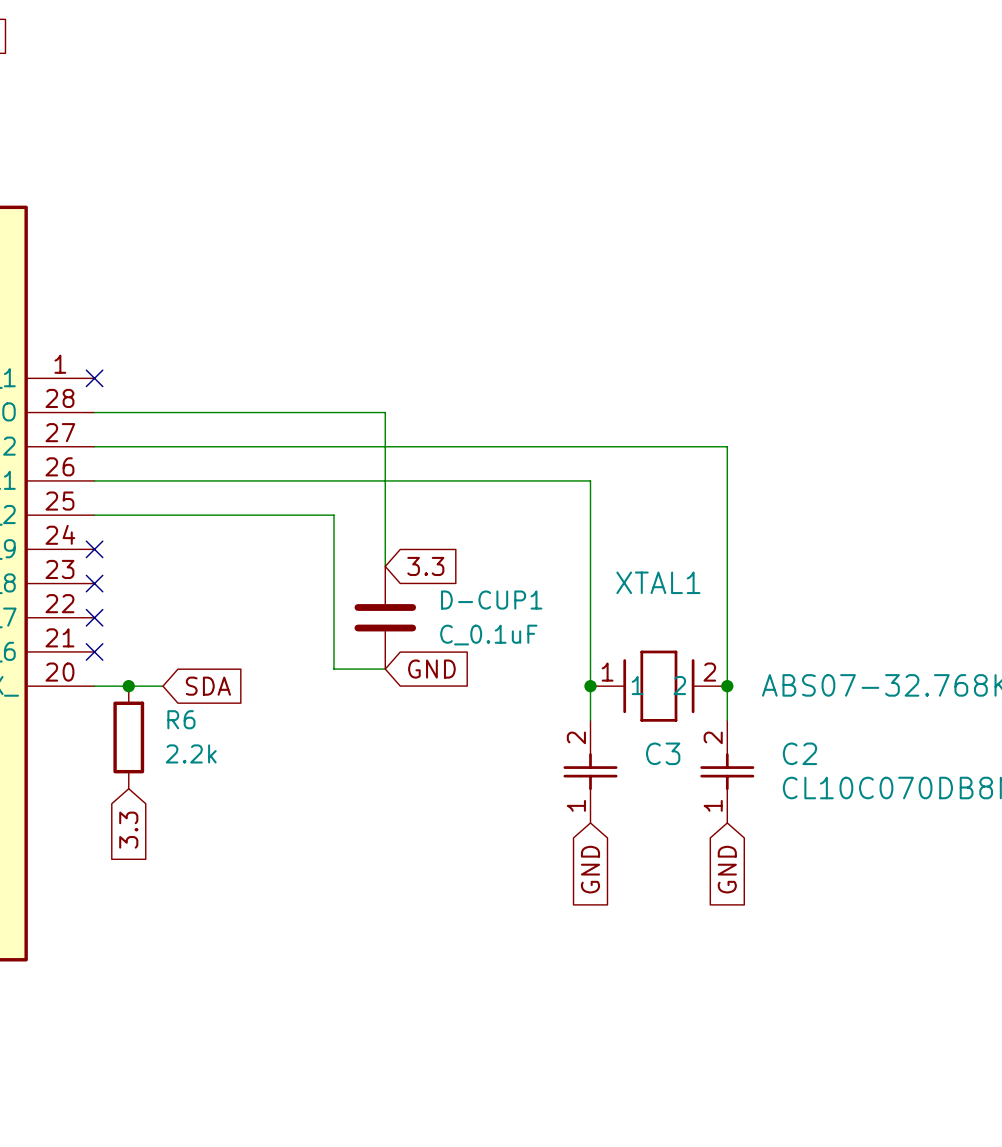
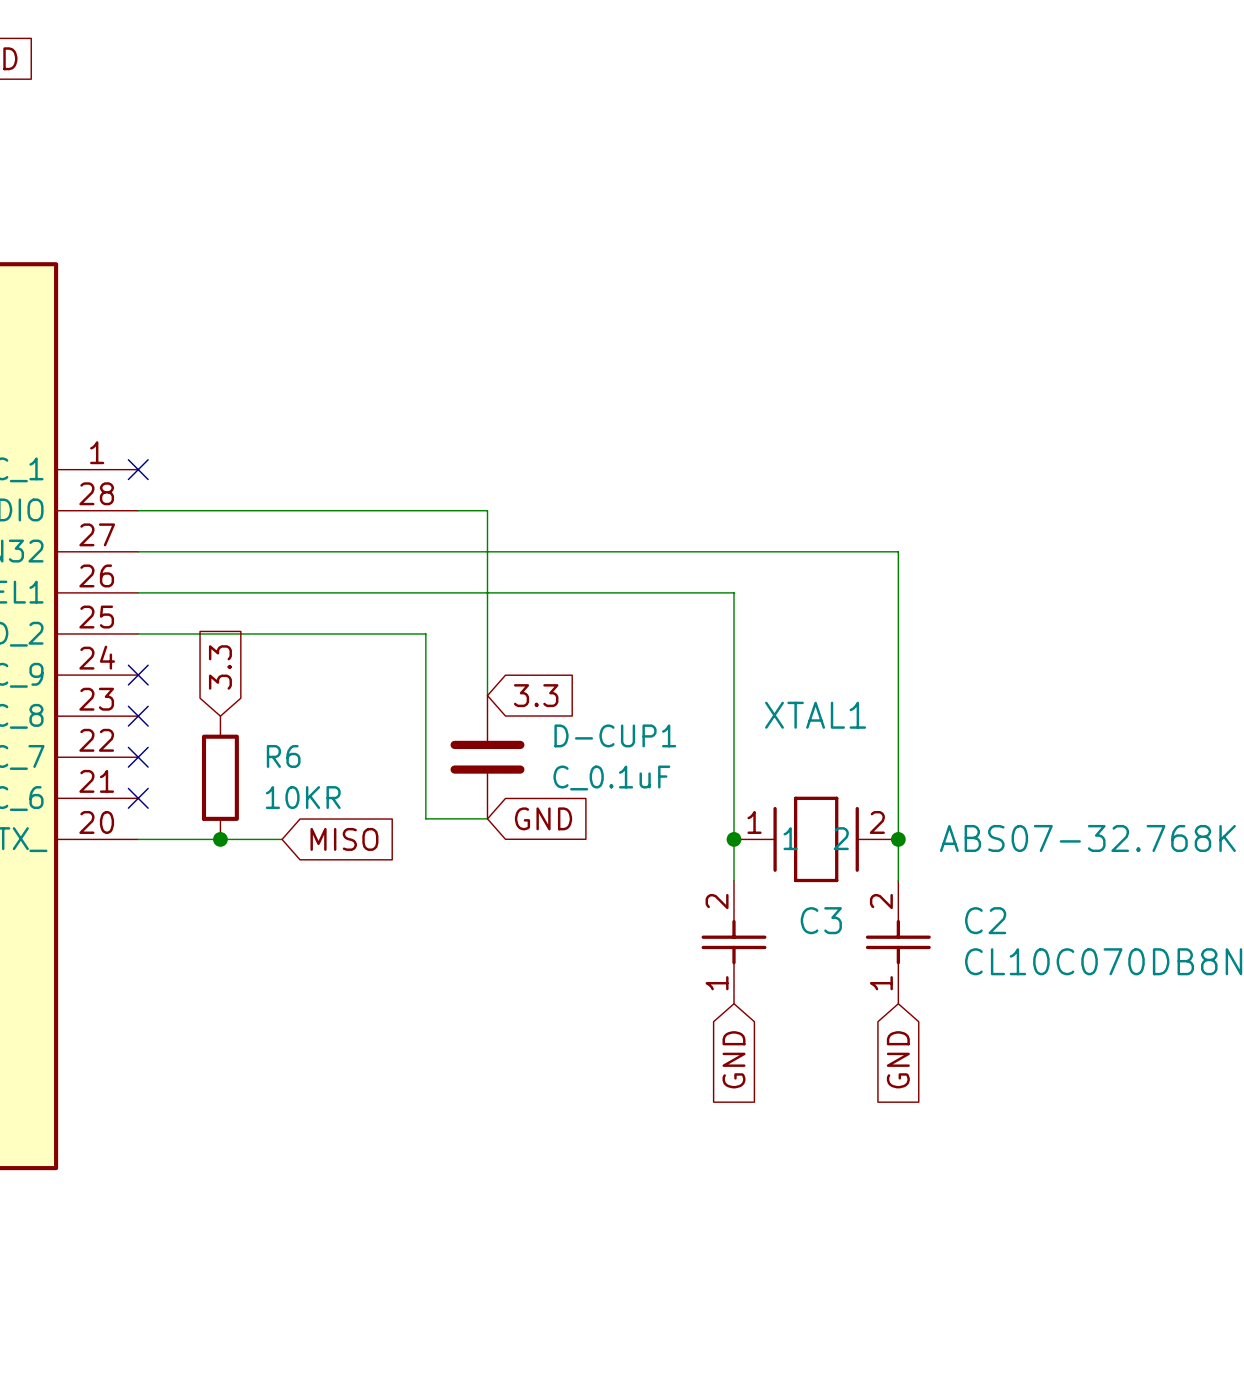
junction position: (128, 686) -> (220, 839)
wire: none -> (220, 839) (282, 839)
global label: SDA (208, 686) -> none
global label: none -> MISO (344, 839)
R6 position: (128, 737) -> (220, 777)
R6 value: 2.2k (191, 753) -> 10KR (303, 797)
global label rotation: 0° (128, 830) -> 180° (220, 667)
global label position: 3.3 (128, 830) -> 3.3 (220, 667)

